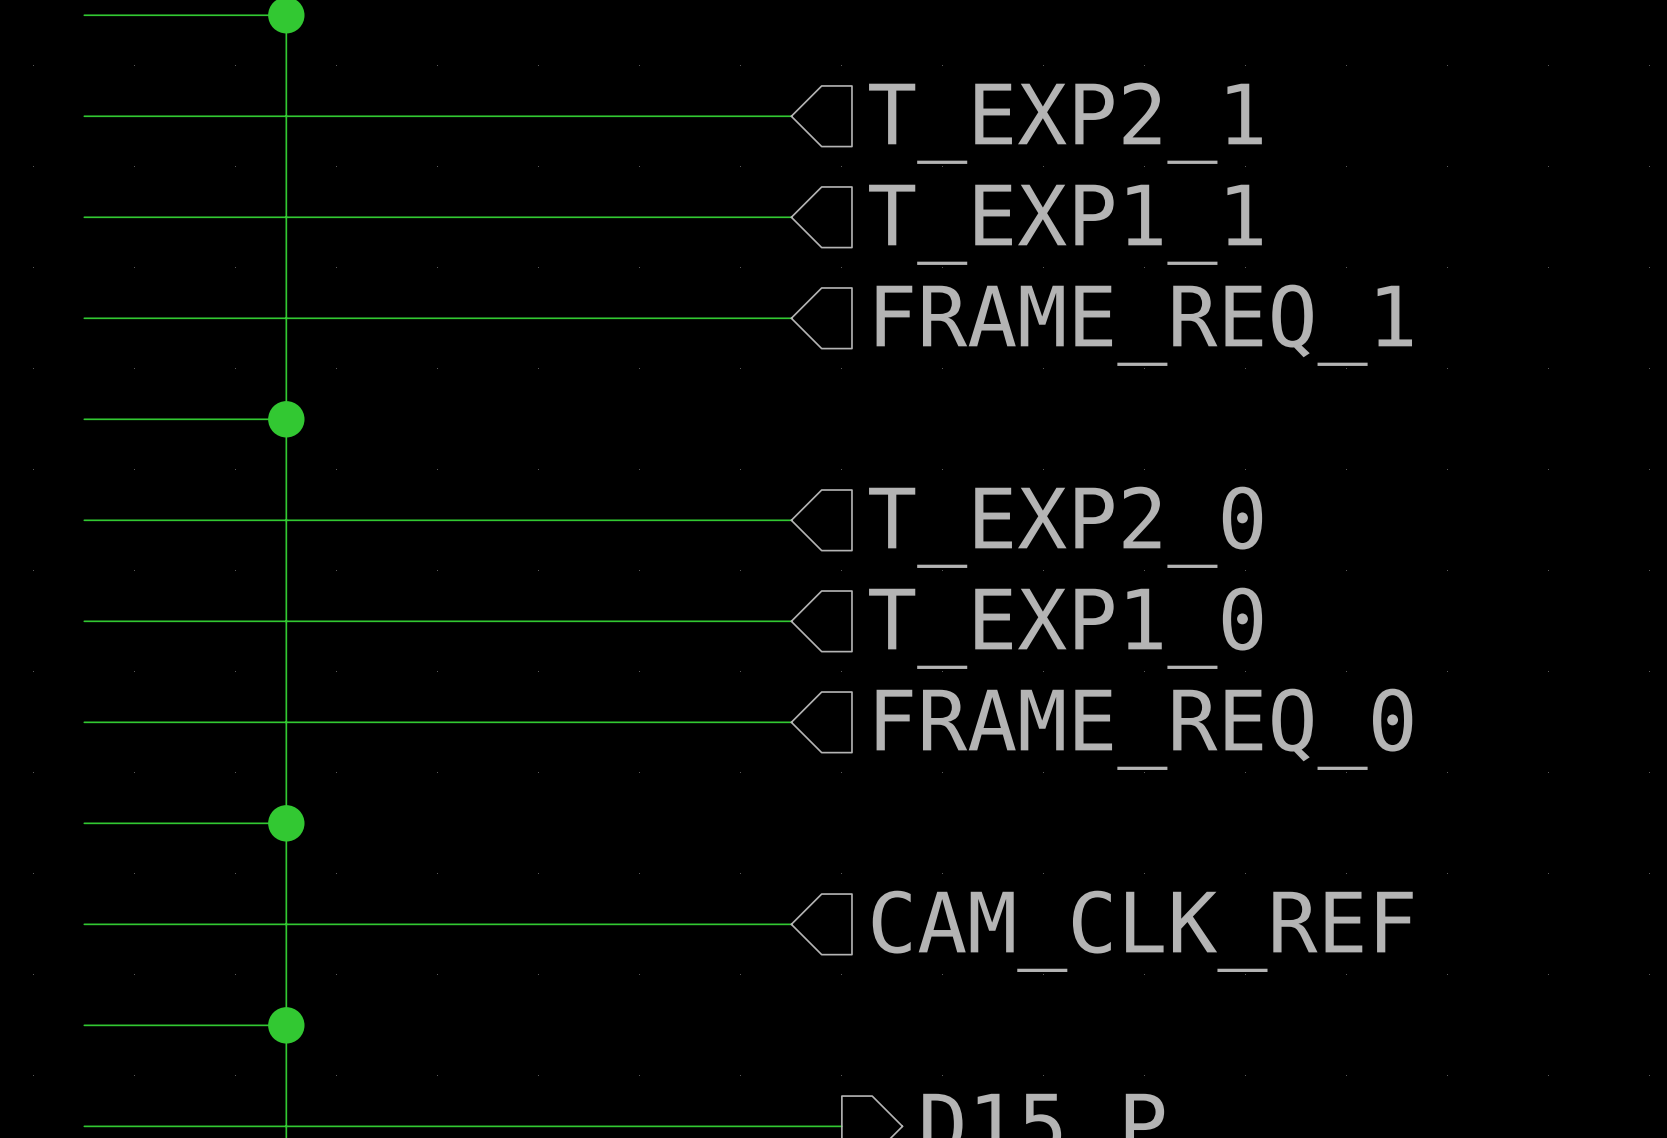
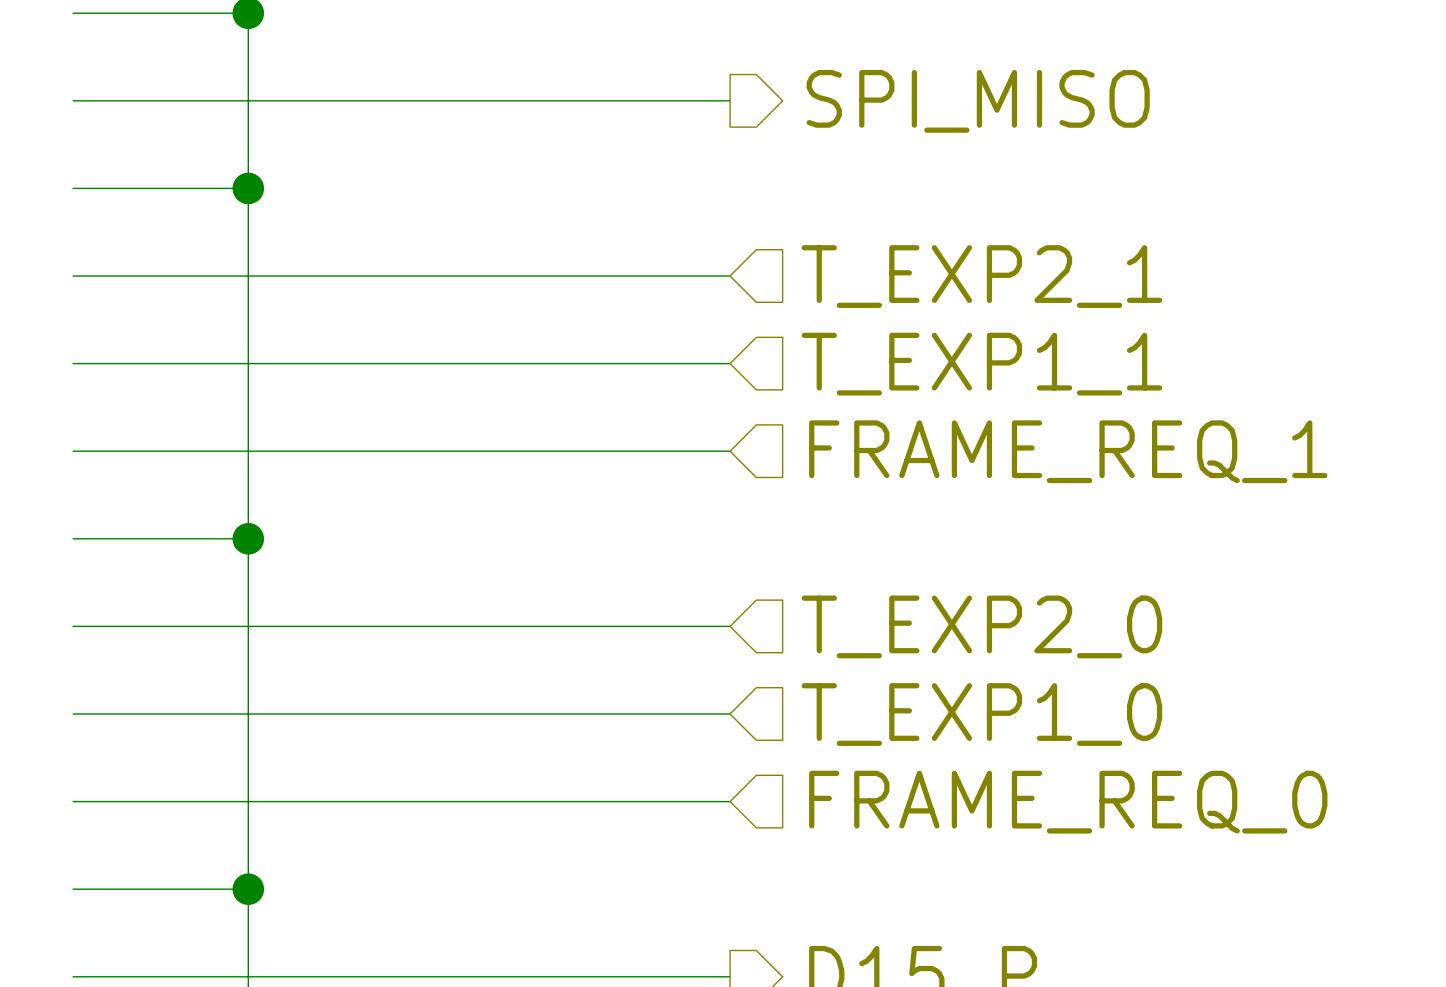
wire: none -> (686, 100) (730, 100)
hierarchical label position: T_EXP2_1 (1065, 123) -> T_EXP2_1 (981, 276)
hierarchical label: none -> SPI_MISO (978, 101)
wire: (286, 217) (791, 217) -> none
junction: none -> (248, 188)
hierarchical label position: T_EXP1_1 (1065, 224) -> T_EXP1_1 (981, 364)
wire: none -> (686, 276) (730, 276)
hierarchical label position: FRAME_REQ_1 (1144, 325) -> FRAME_REQ_1 (1068, 451)
wire: none -> (248, 363) (730, 363)
junction: (286, 419) -> none
wire: none -> (686, 451) (730, 451)
hierarchical label position: T_EXP2_0 (1065, 527) -> T_EXP2_0 (981, 626)
wire: (286, 621) (791, 621) -> none
junction: none -> (248, 538)
hierarchical label position: T_EXP1_0 (1065, 628) -> T_EXP1_0 (981, 714)
wire: none -> (686, 626) (730, 626)
hierarchical label position: FRAME_REQ_0 (1144, 729) -> FRAME_REQ_0 (1068, 802)
wire: none -> (248, 713) (730, 713)
junction: (286, 823) -> none
wire: none -> (686, 801) (730, 801)
hierarchical label: CAM_CLK_REF (1142, 931) -> none

